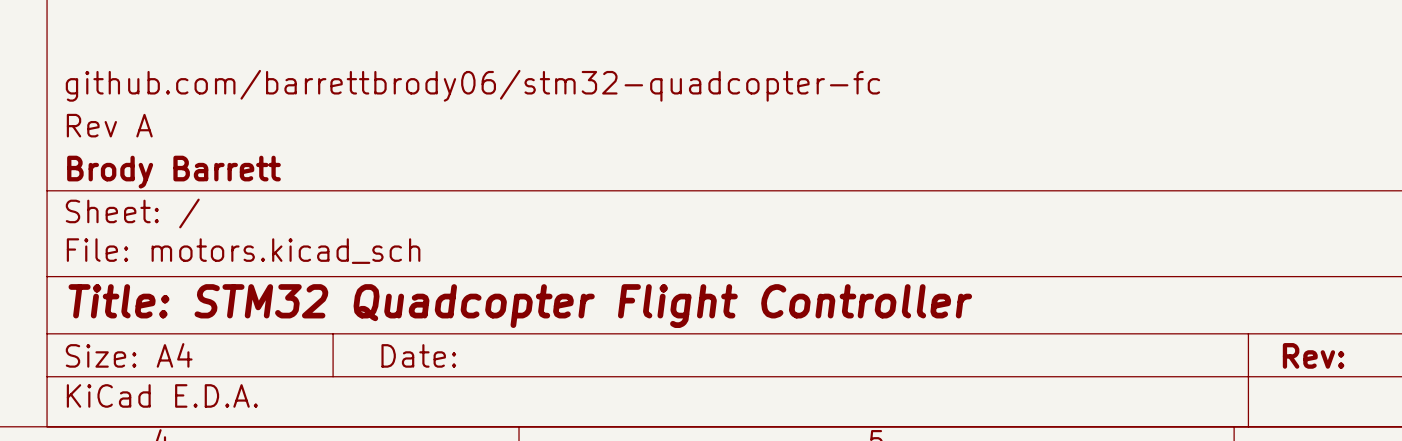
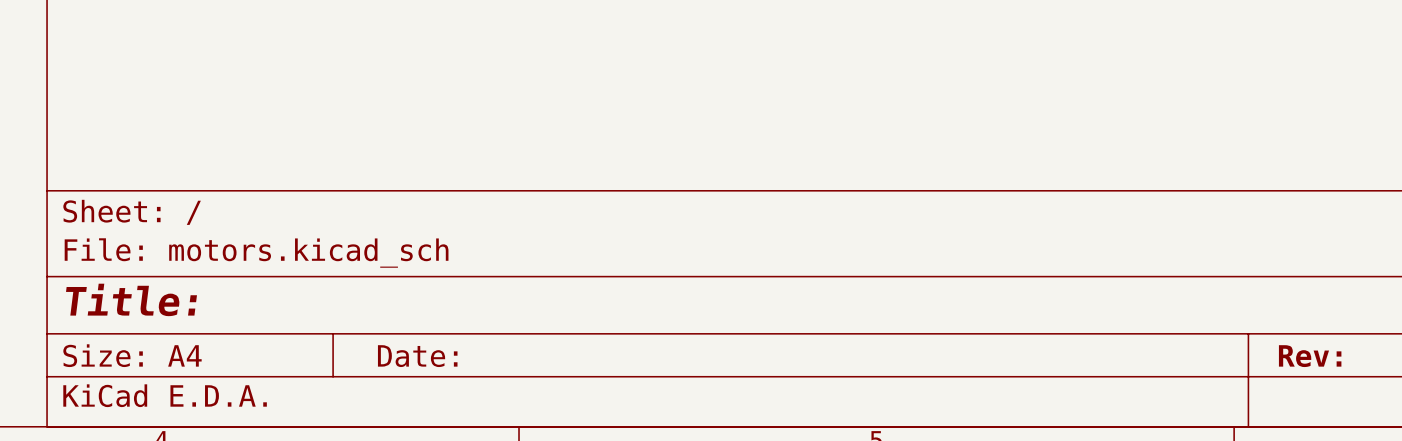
title block: github.com/barrettbrody06/stm32-quadcopter-fc (472, 85) -> none
title block: Rev A (109, 125) -> none
title block: Brody Barrett (173, 172) -> none
title block: Title: STM32 Quadcopter Flight Controller (520, 306) -> Title: (131, 299)

